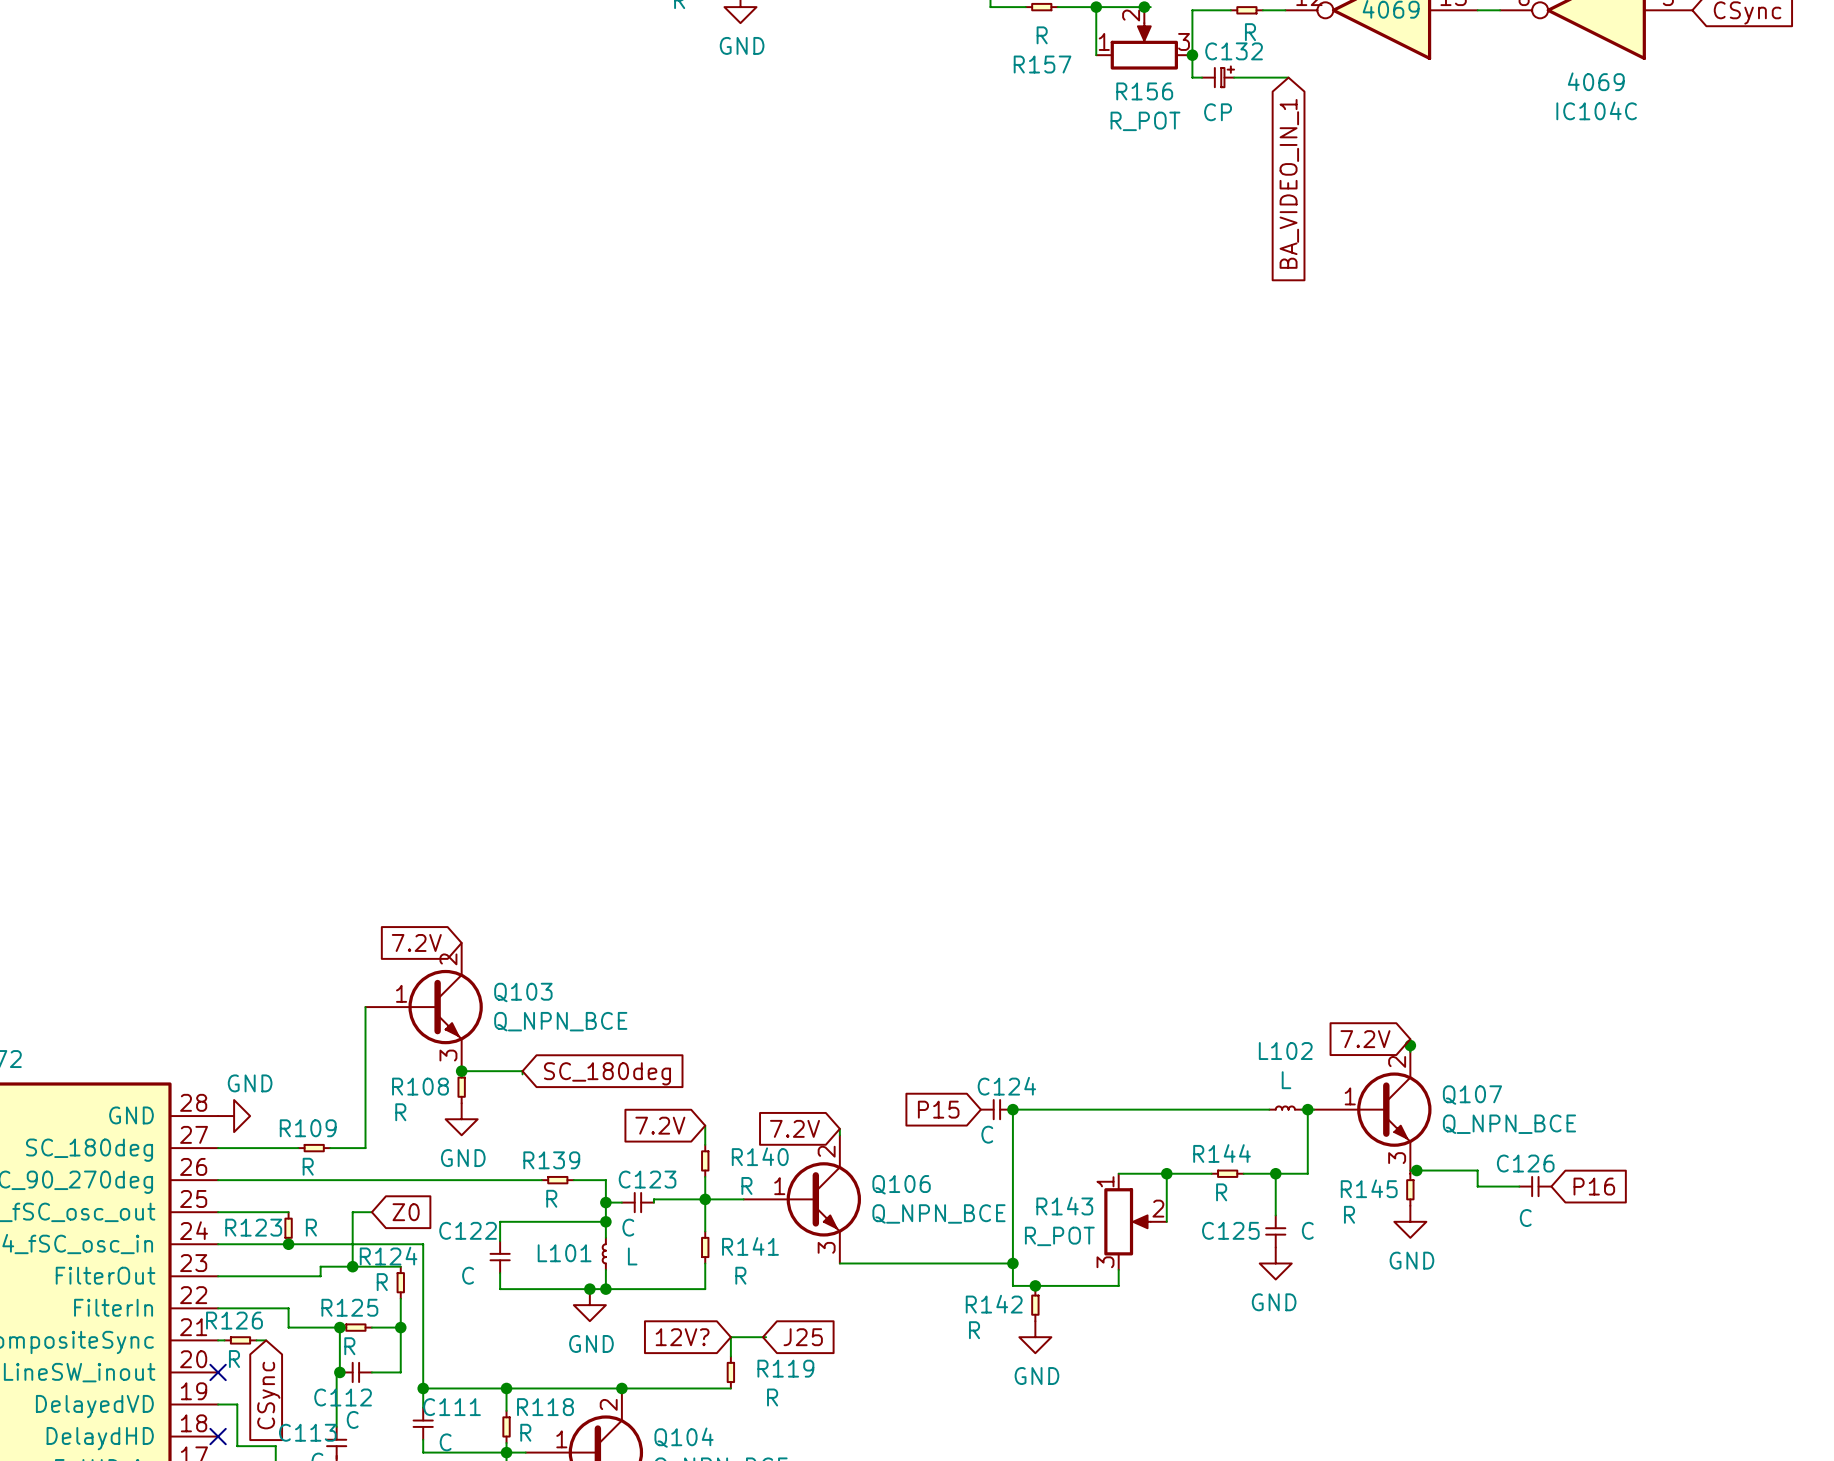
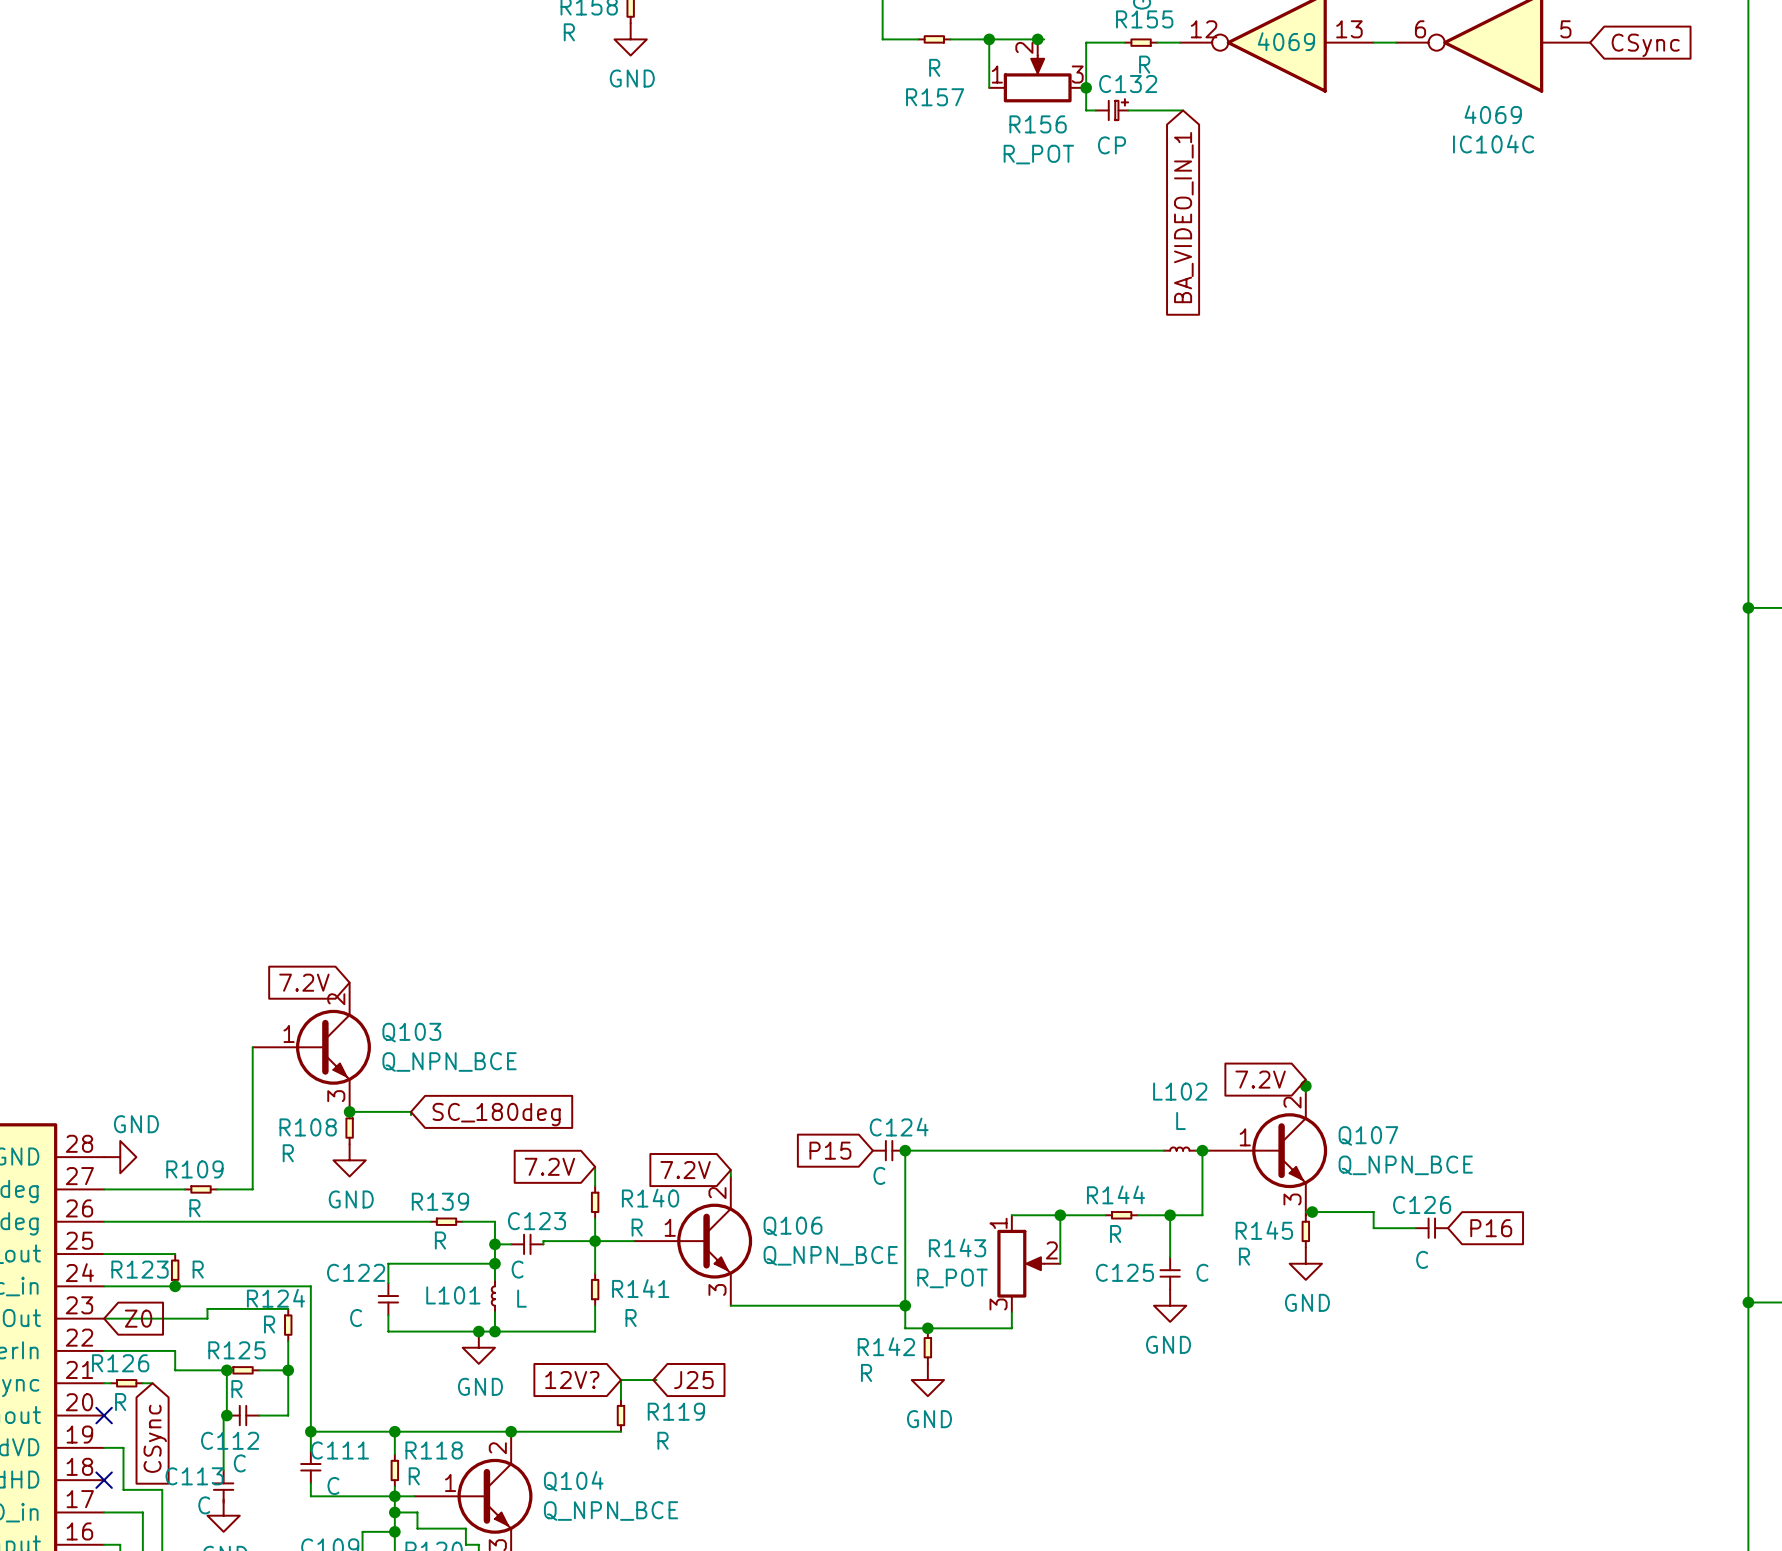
wire: (371, 1212) (352, 1212) (352, 1266) -> none
global label position: Z0 (406, 1212) -> Z0 (138, 1318)
junction: (352, 1266) -> none

